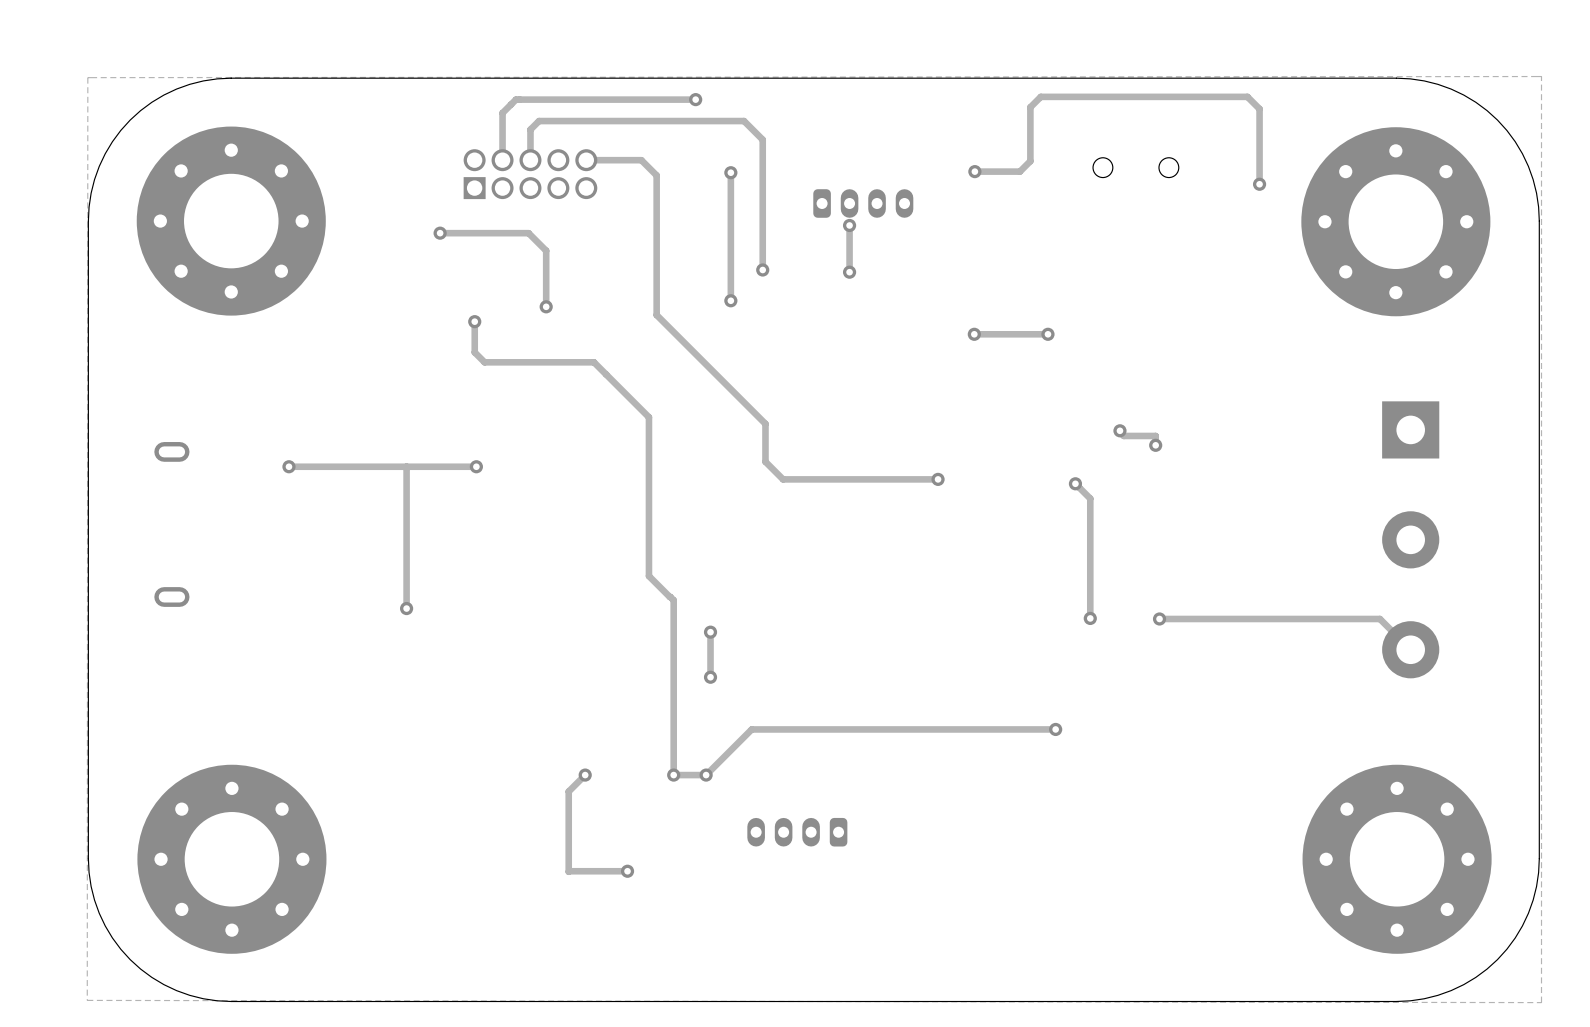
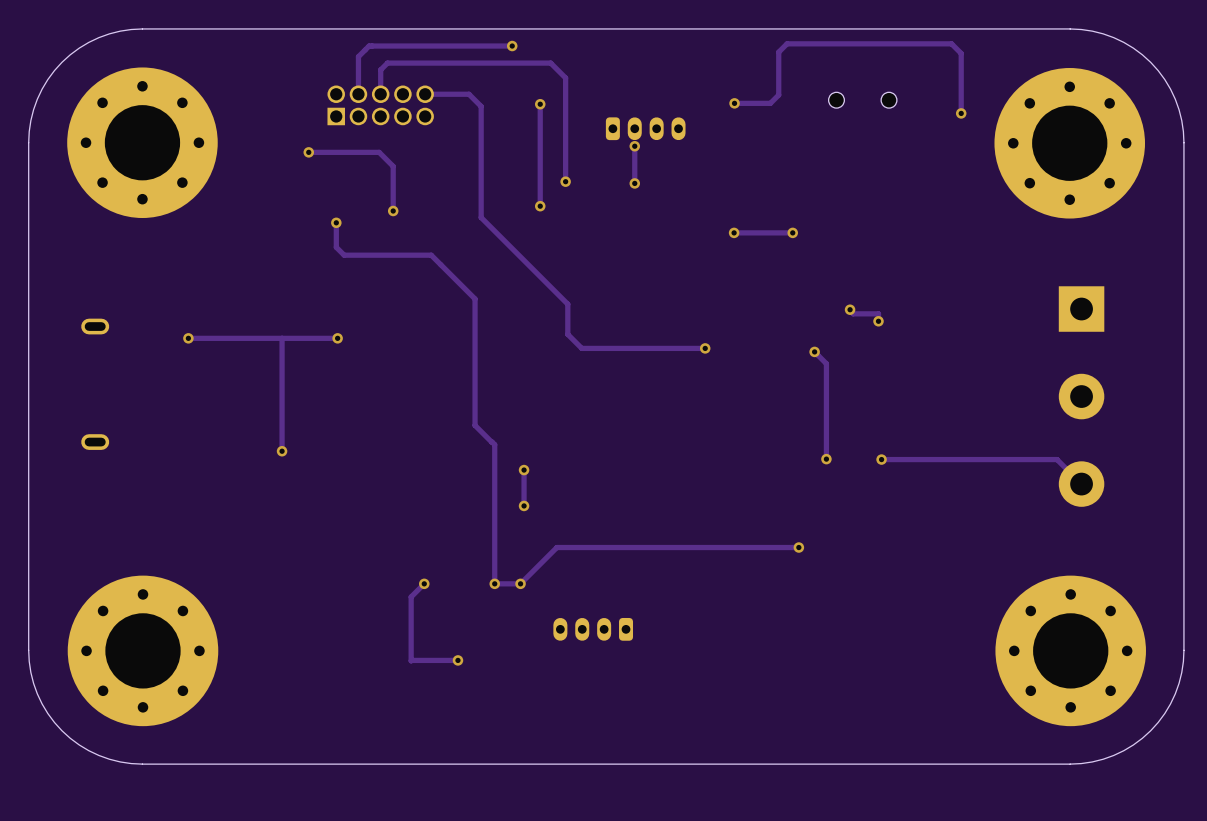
zone outline: (1541, 76) (1541, 1002) (87, 1000) (87, 77) (1541, 76) -> none

